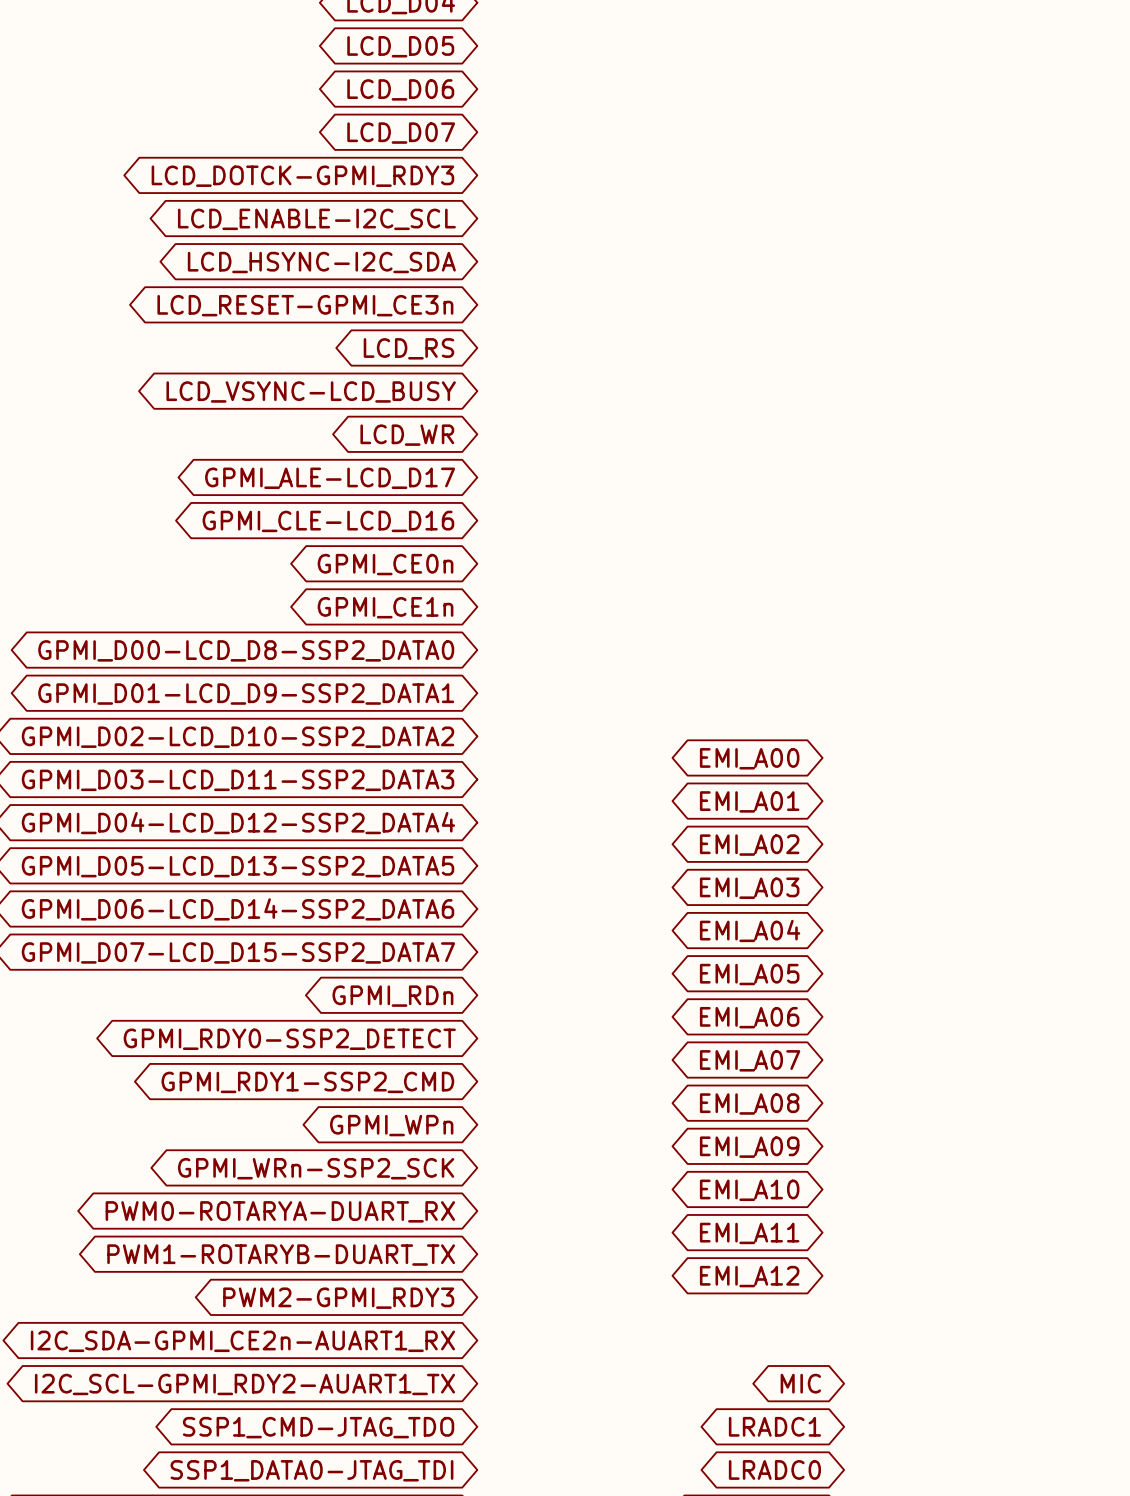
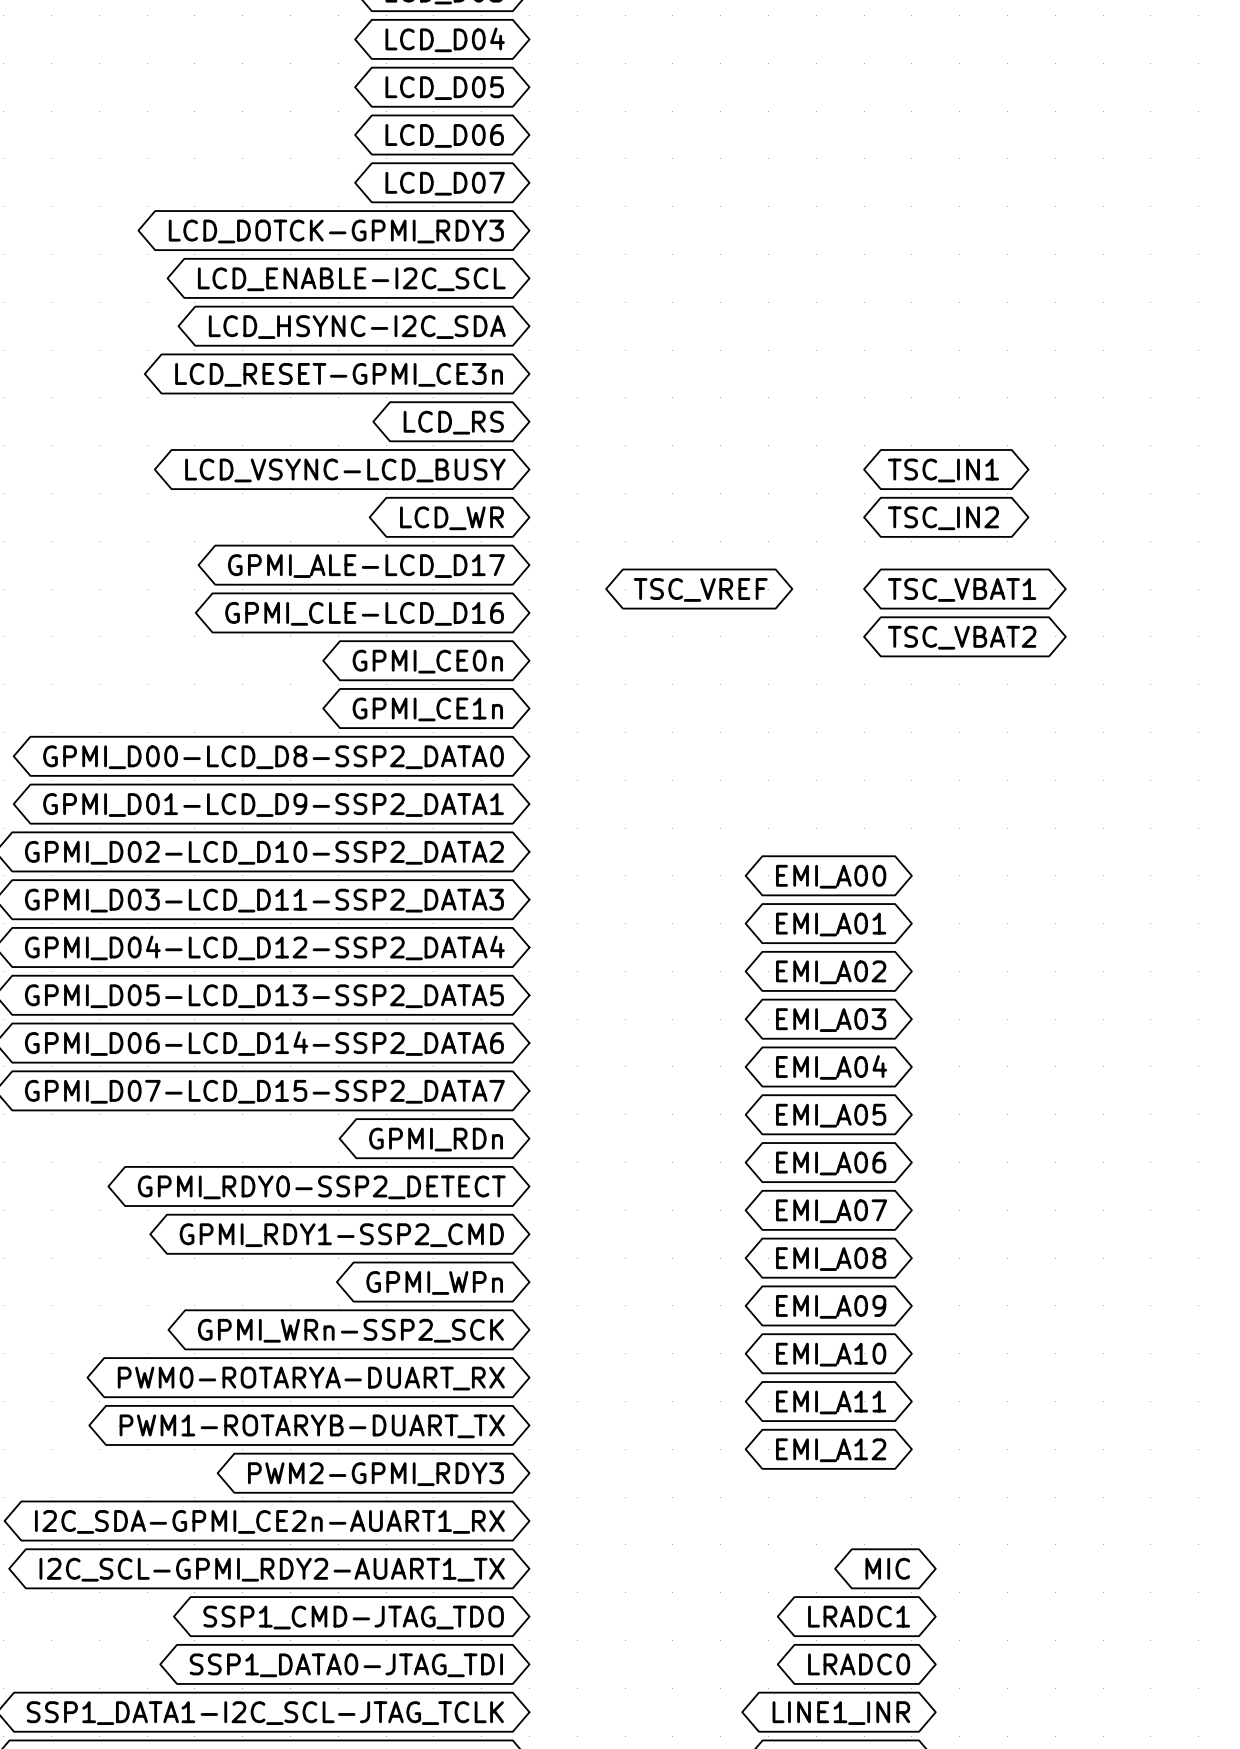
global label: none -> TSC_IN1 (943, 470)
global label: none -> TSC_IN2 (943, 518)
global label: none -> TSC_VREF (700, 589)
global label: none -> TSC_VBAT1 (962, 589)
global label: none -> TSC_VBAT2 (962, 637)

